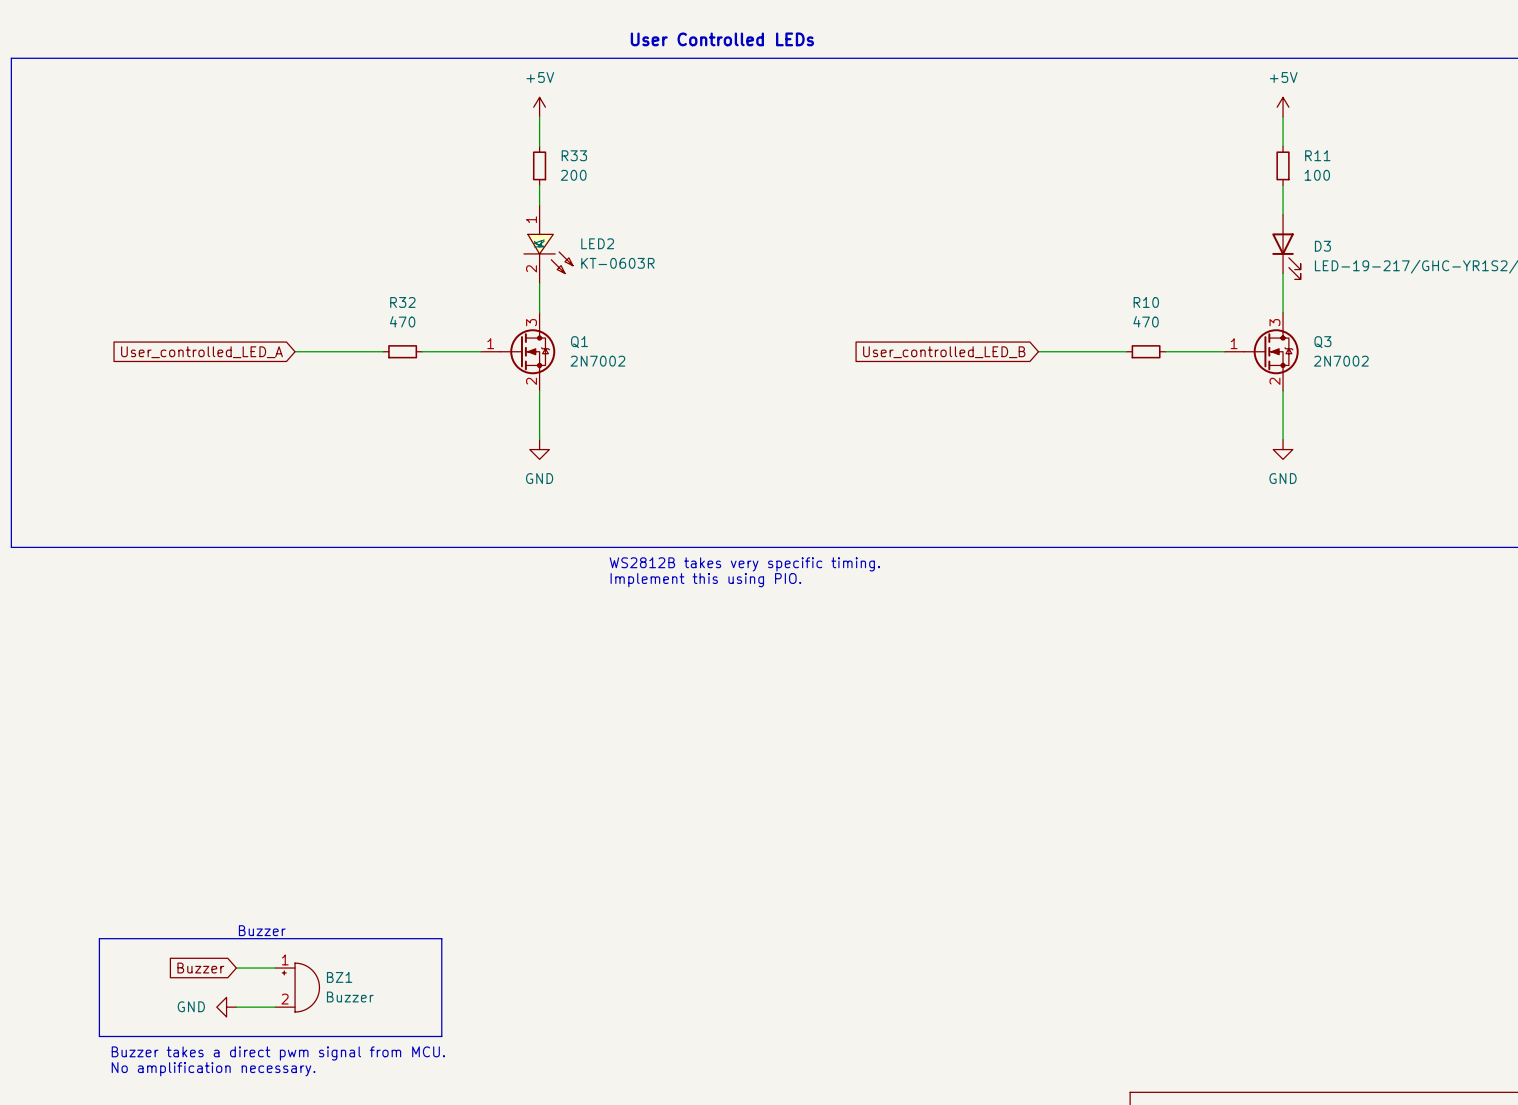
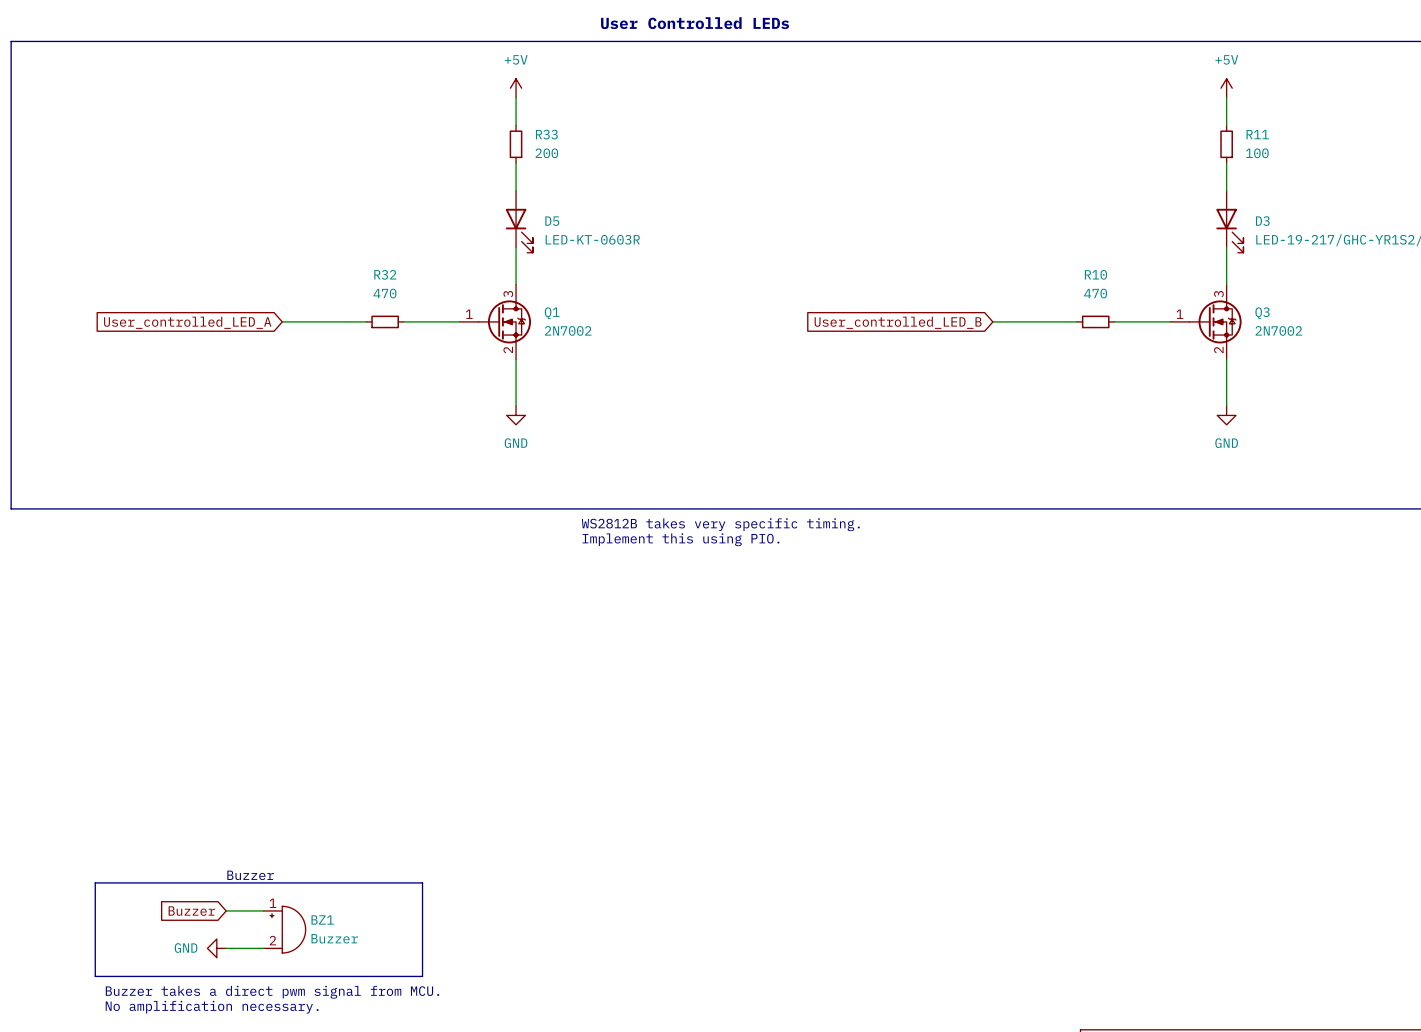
LED2: KT-0603R (548, 244) -> none
D5: none -> LED-KT-0603R (519, 221)

